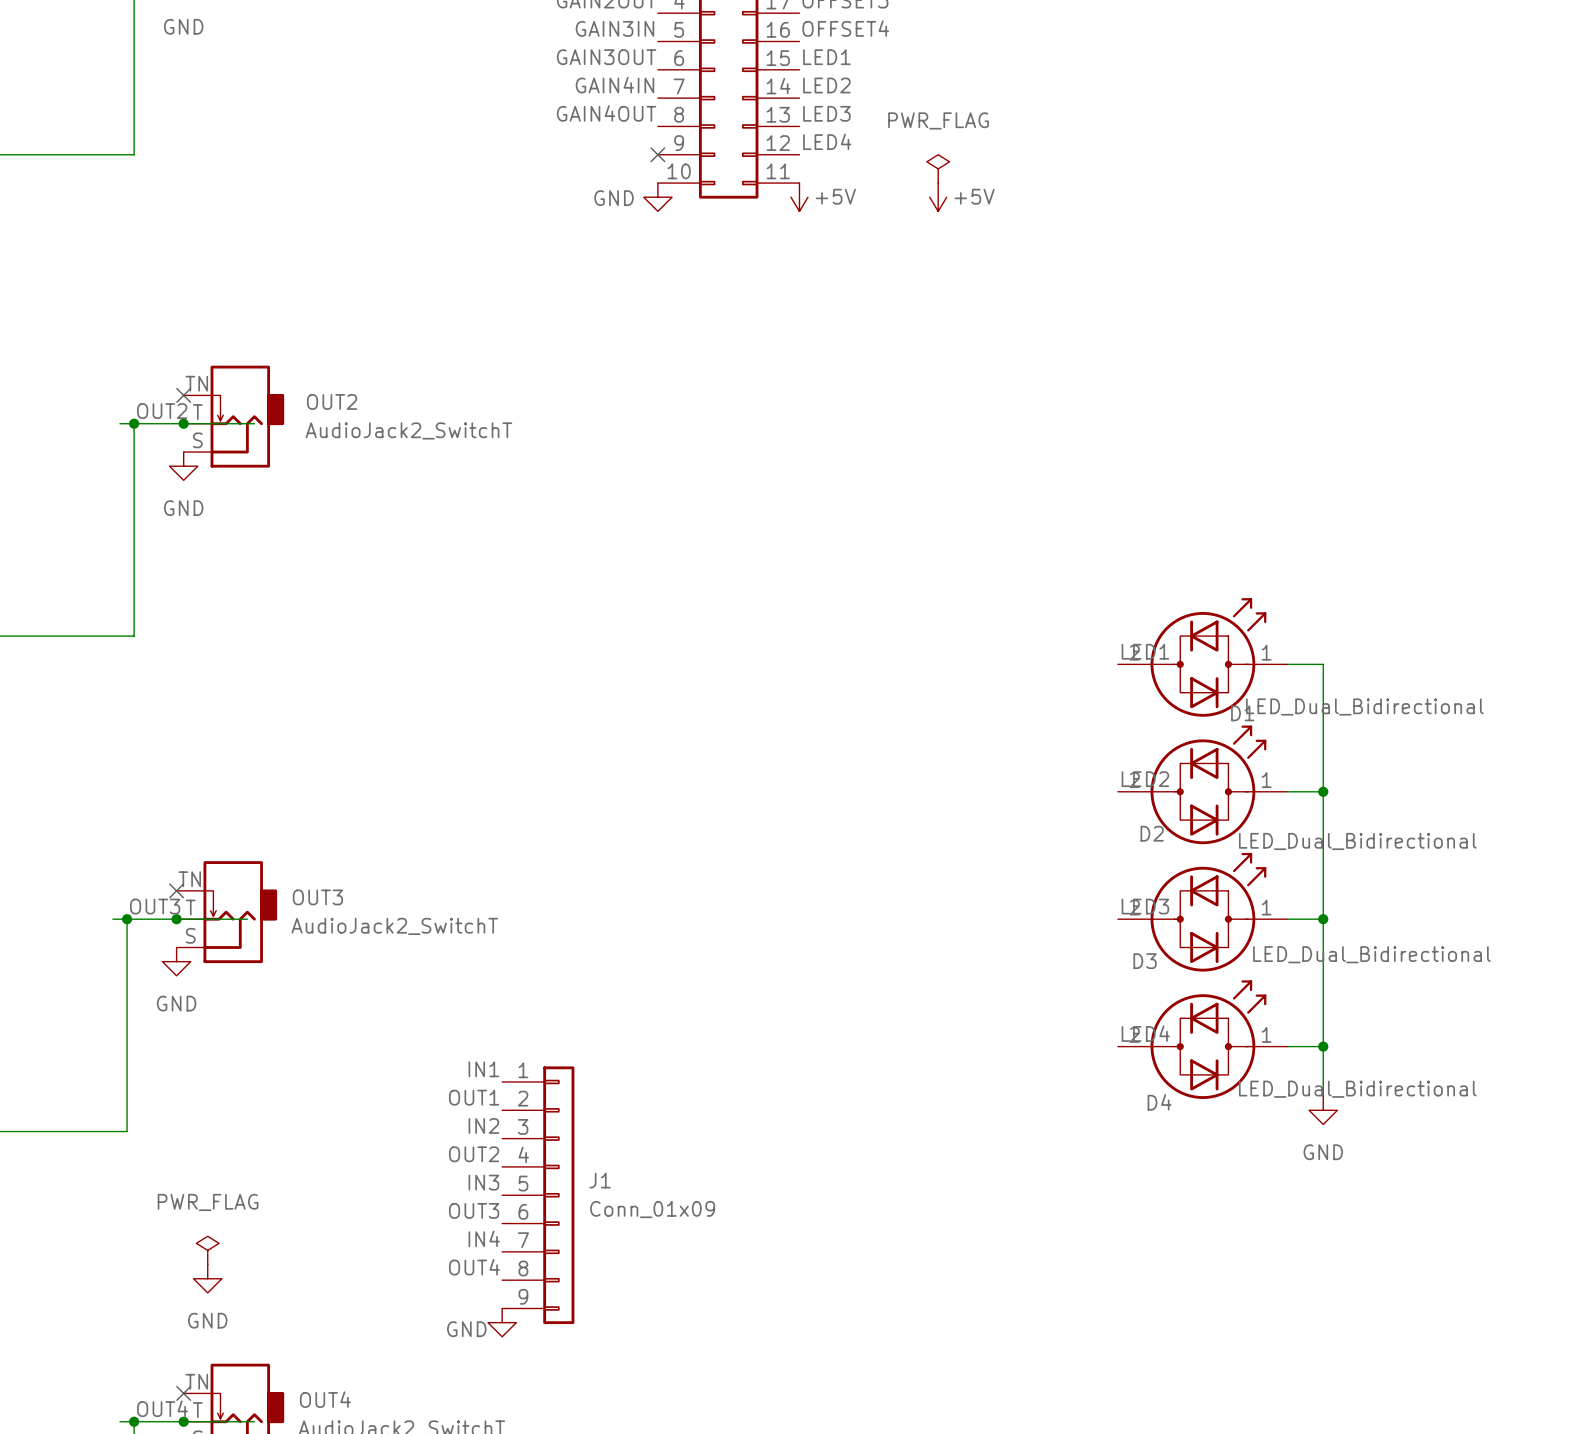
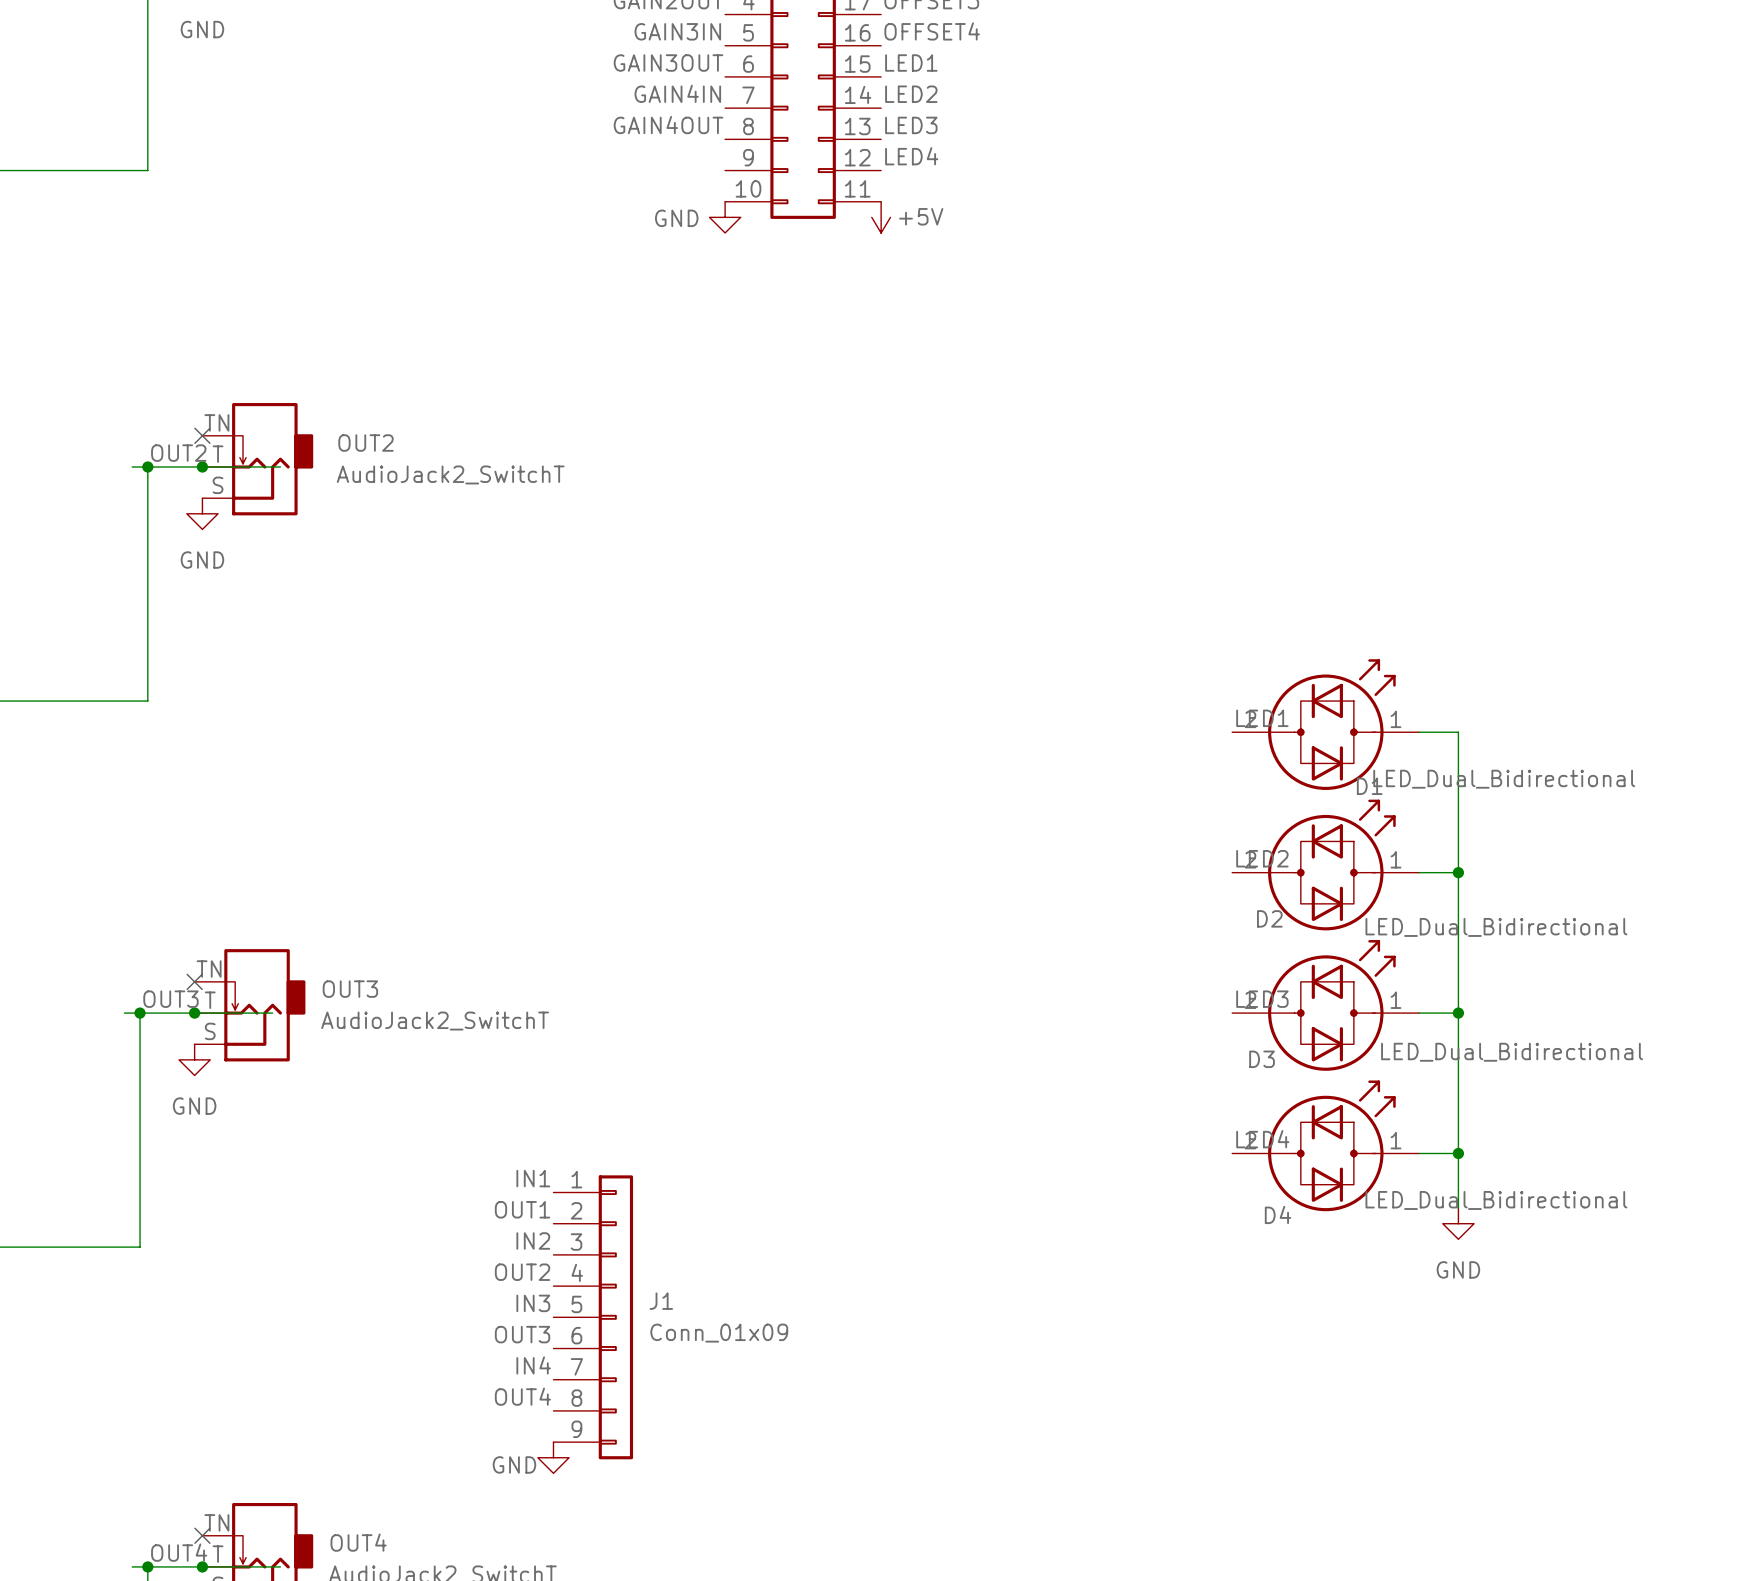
no-connect mark: (657, 154) -> none
power symbol: PWR_FLAG (938, 168) -> none
power symbol: +5V (938, 197) -> none
power symbol: PWR_FLAG (207, 1250) -> none
power symbol: GND (207, 1278) -> none

